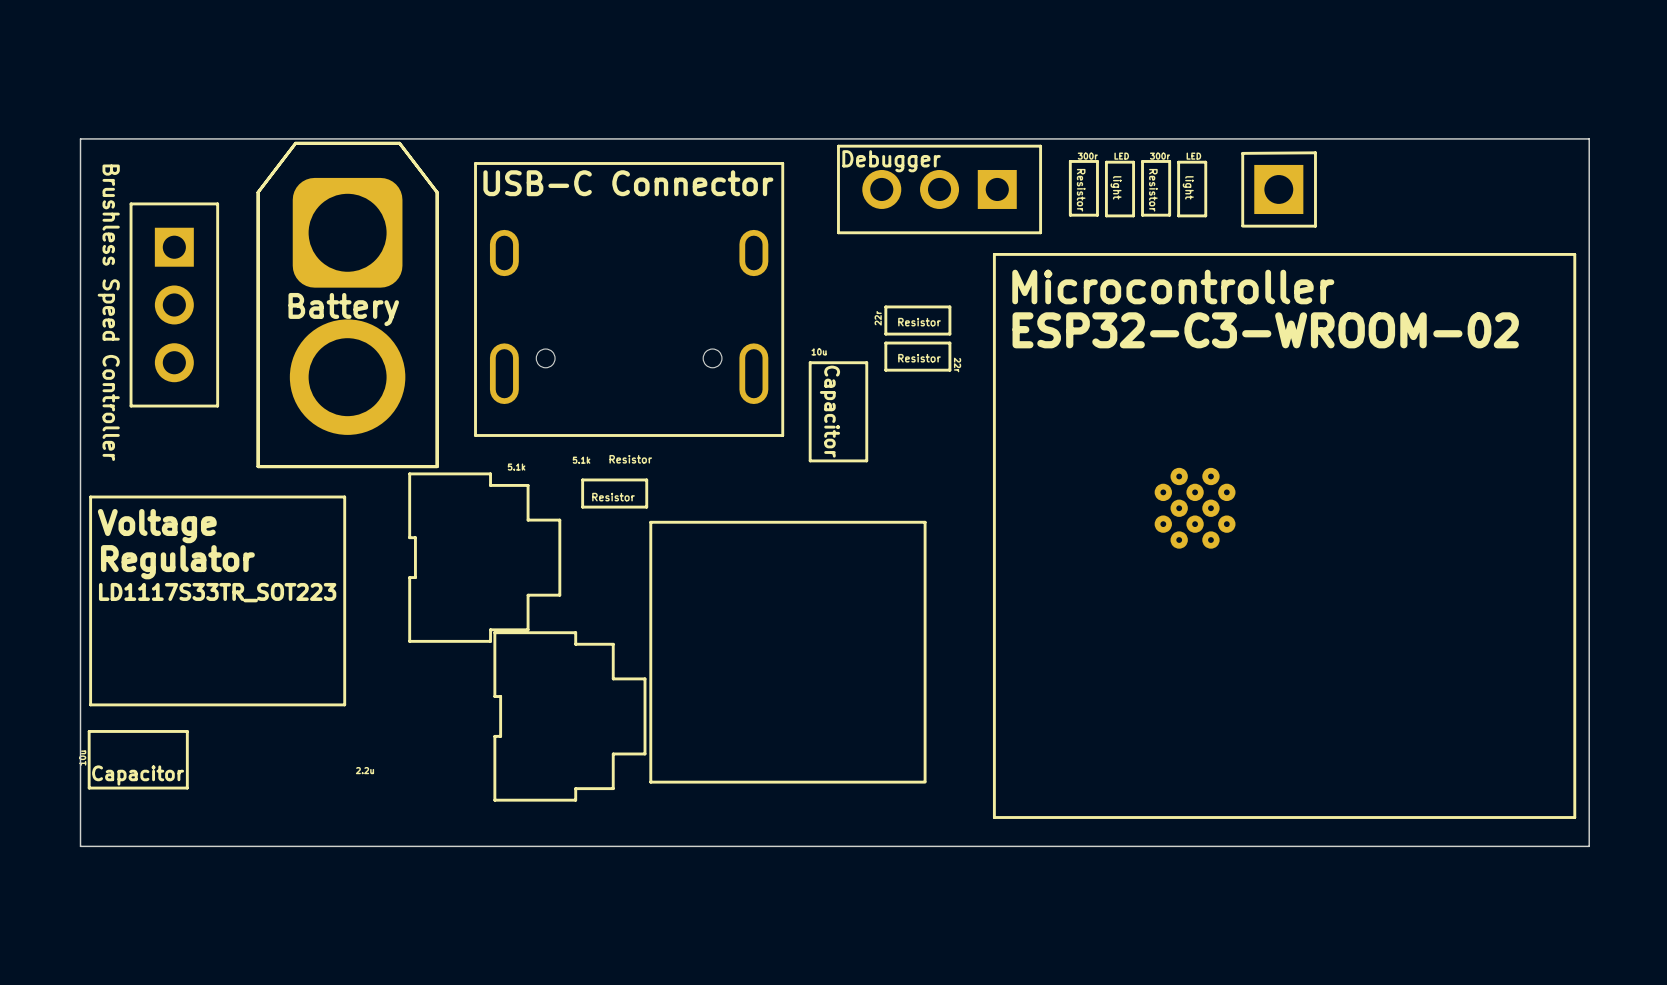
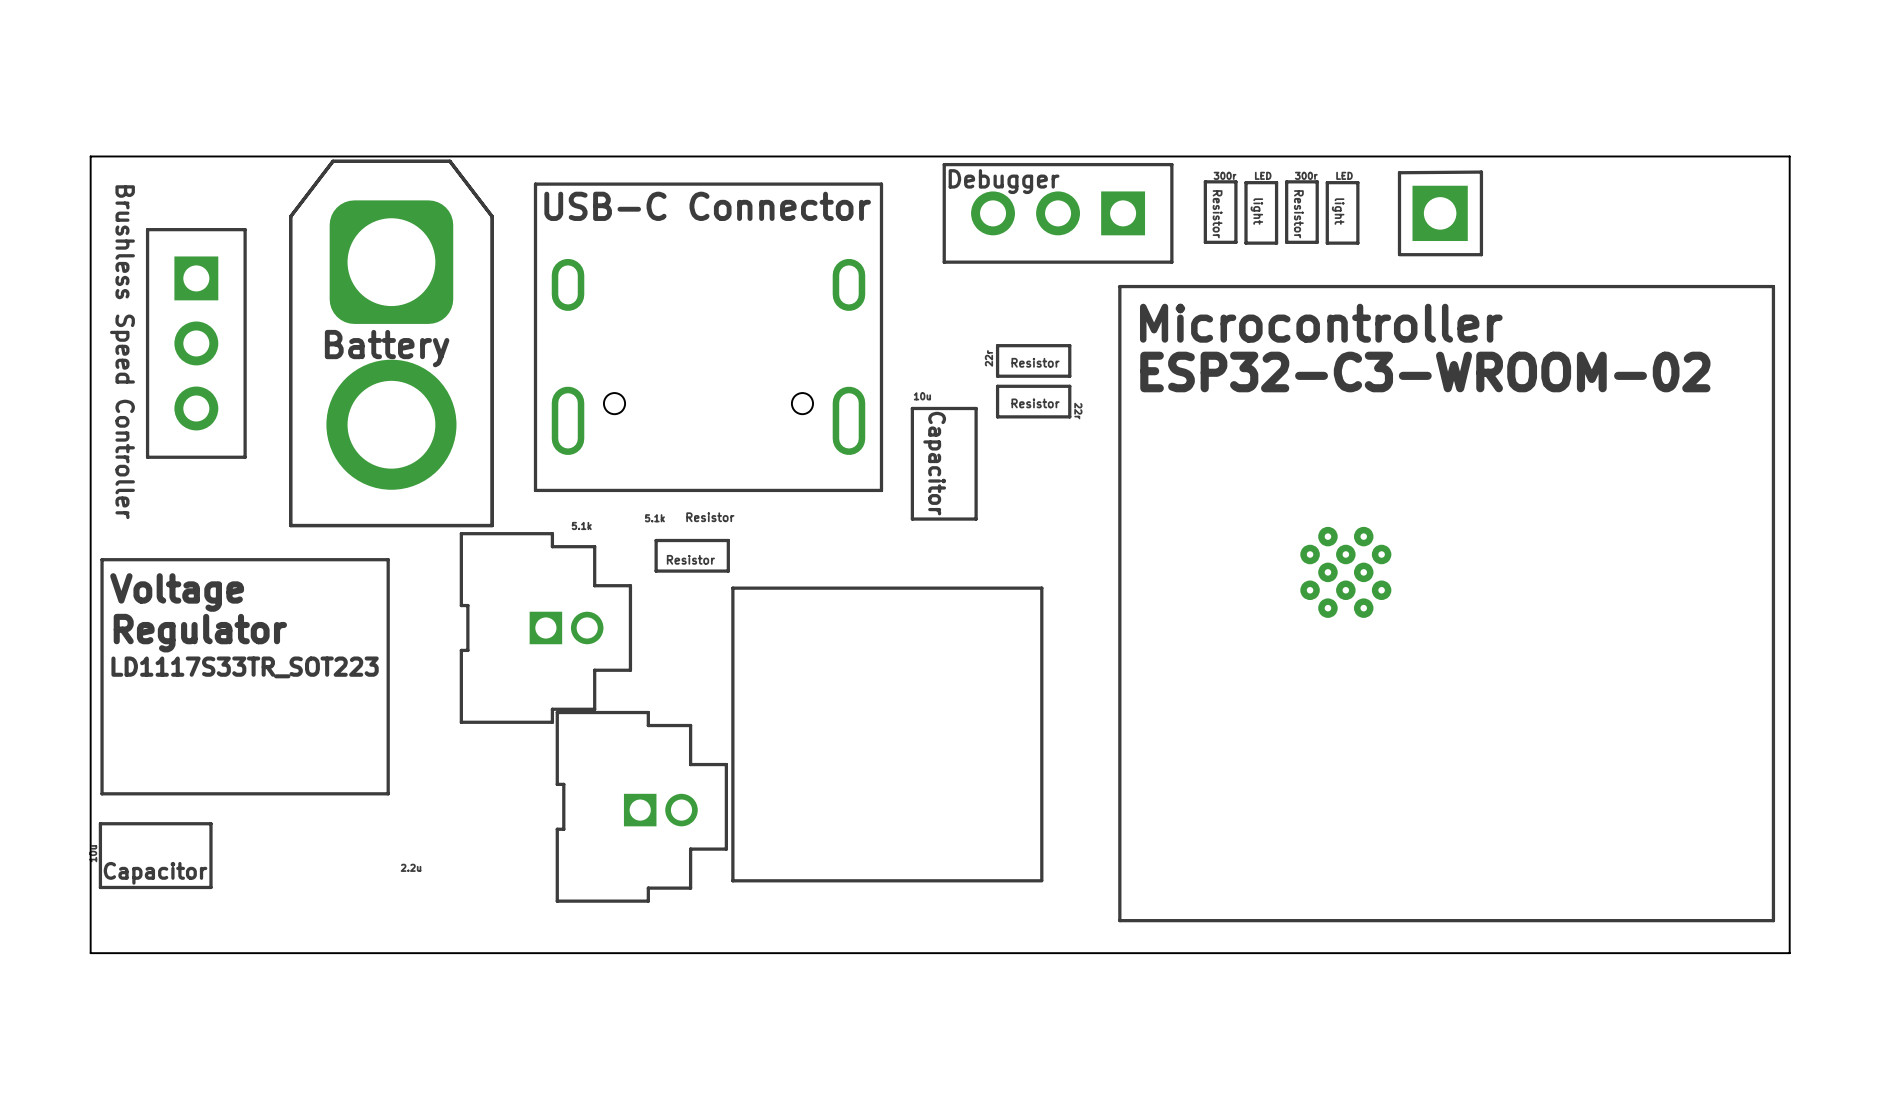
part: none -> (566, 627)
part: none -> (660, 810)

